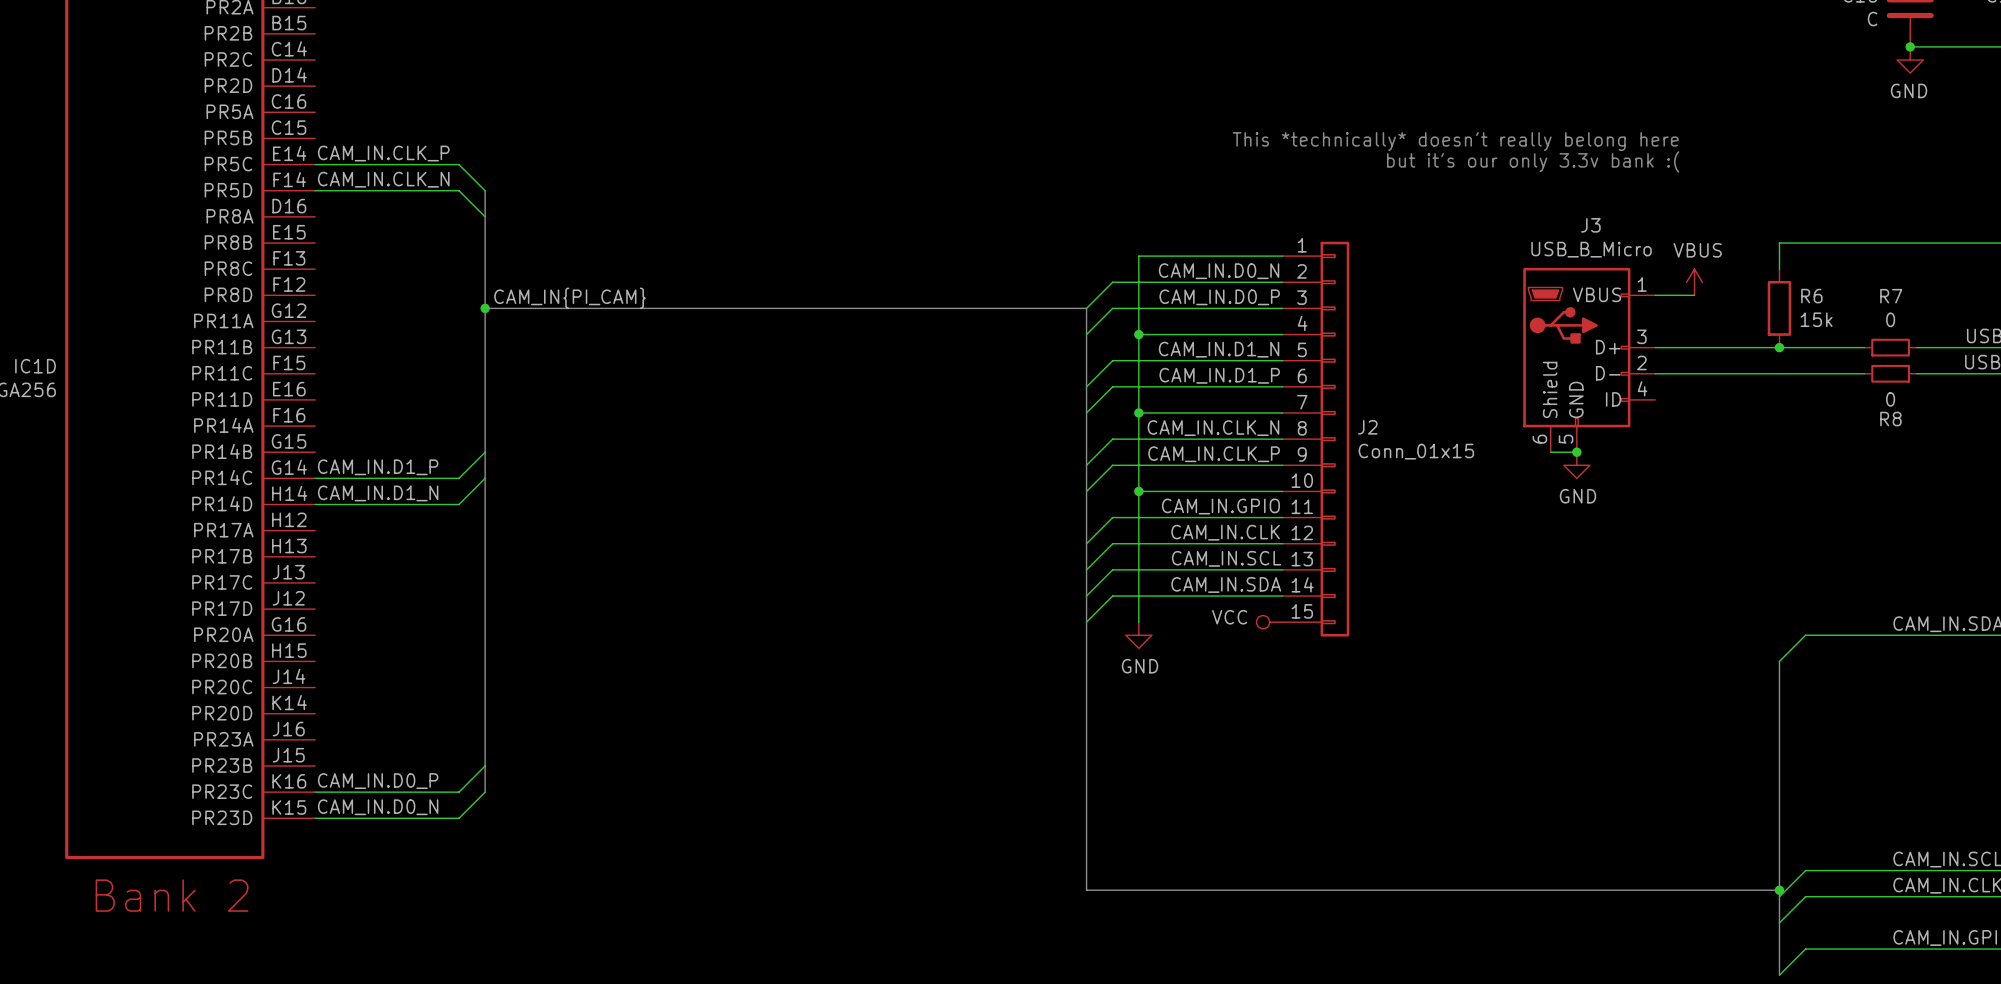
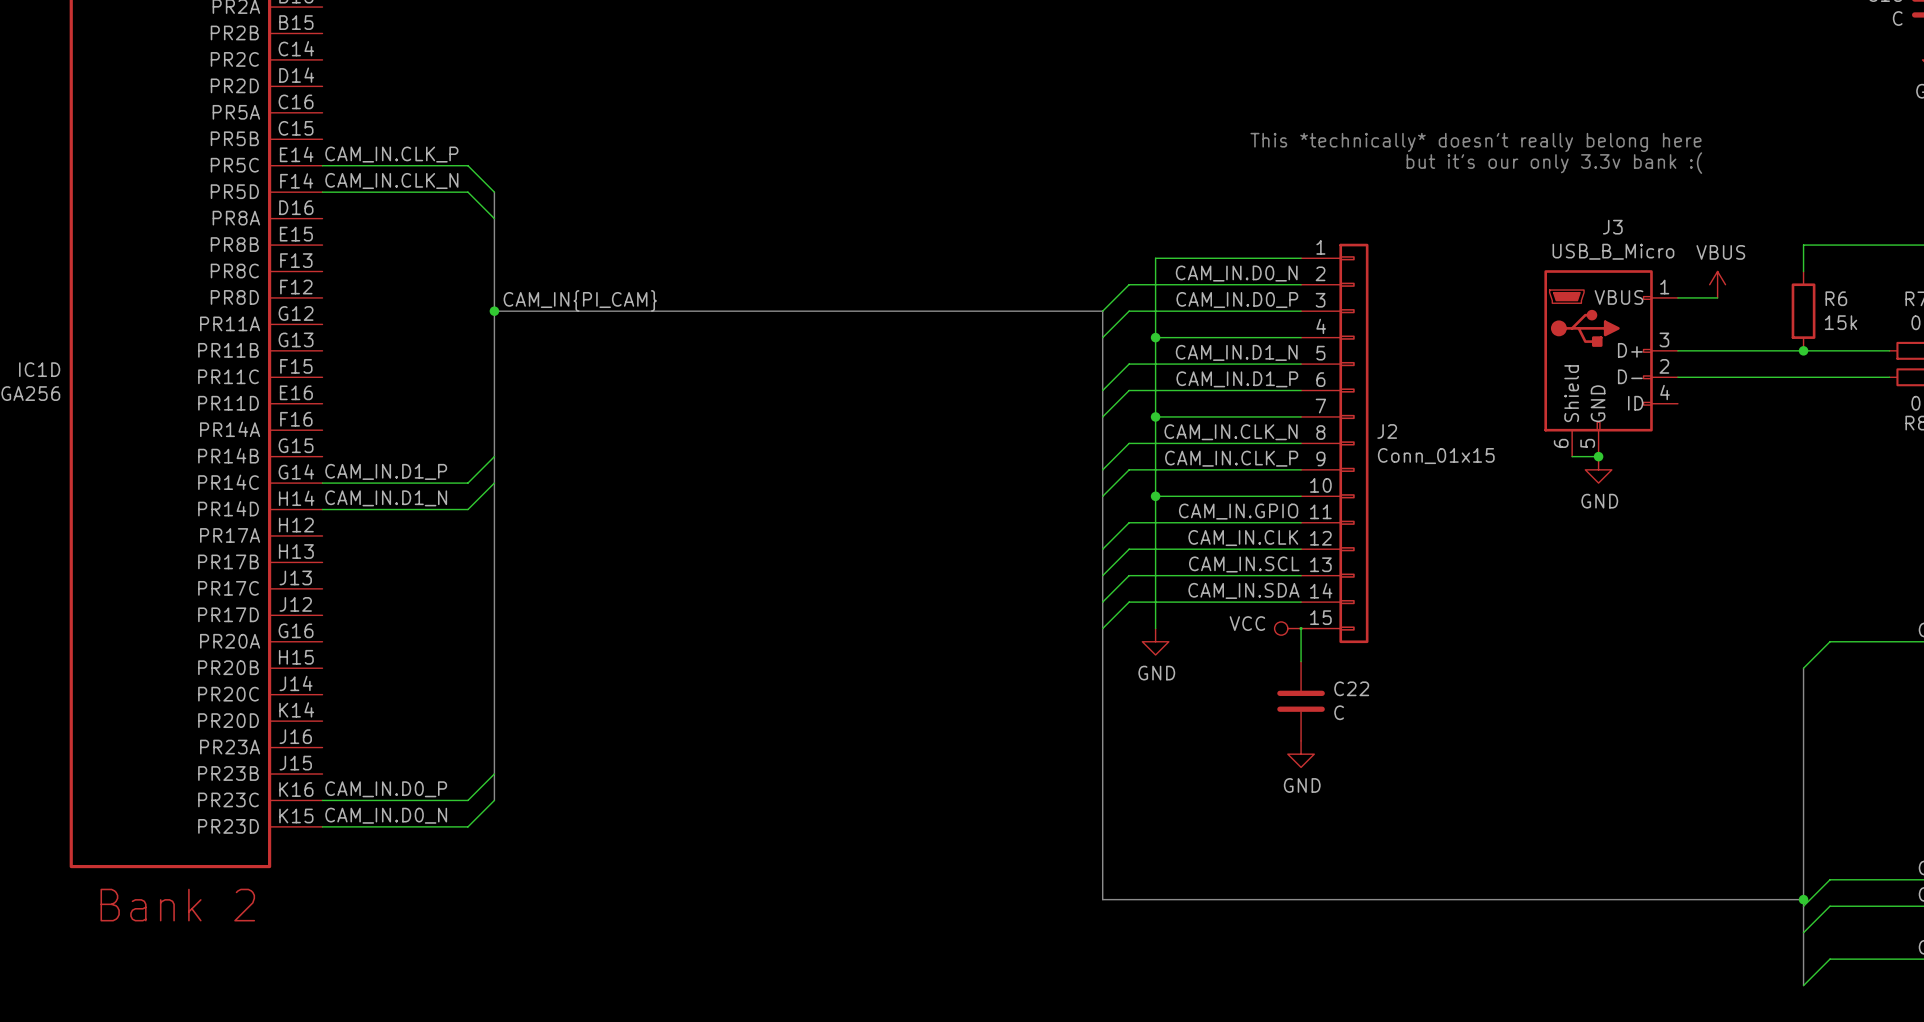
wire: none -> (1301, 628) (1301, 661)
junction: none -> (1301, 628)
C22: none -> C (1301, 701)
power symbol: none -> GND (1301, 754)

